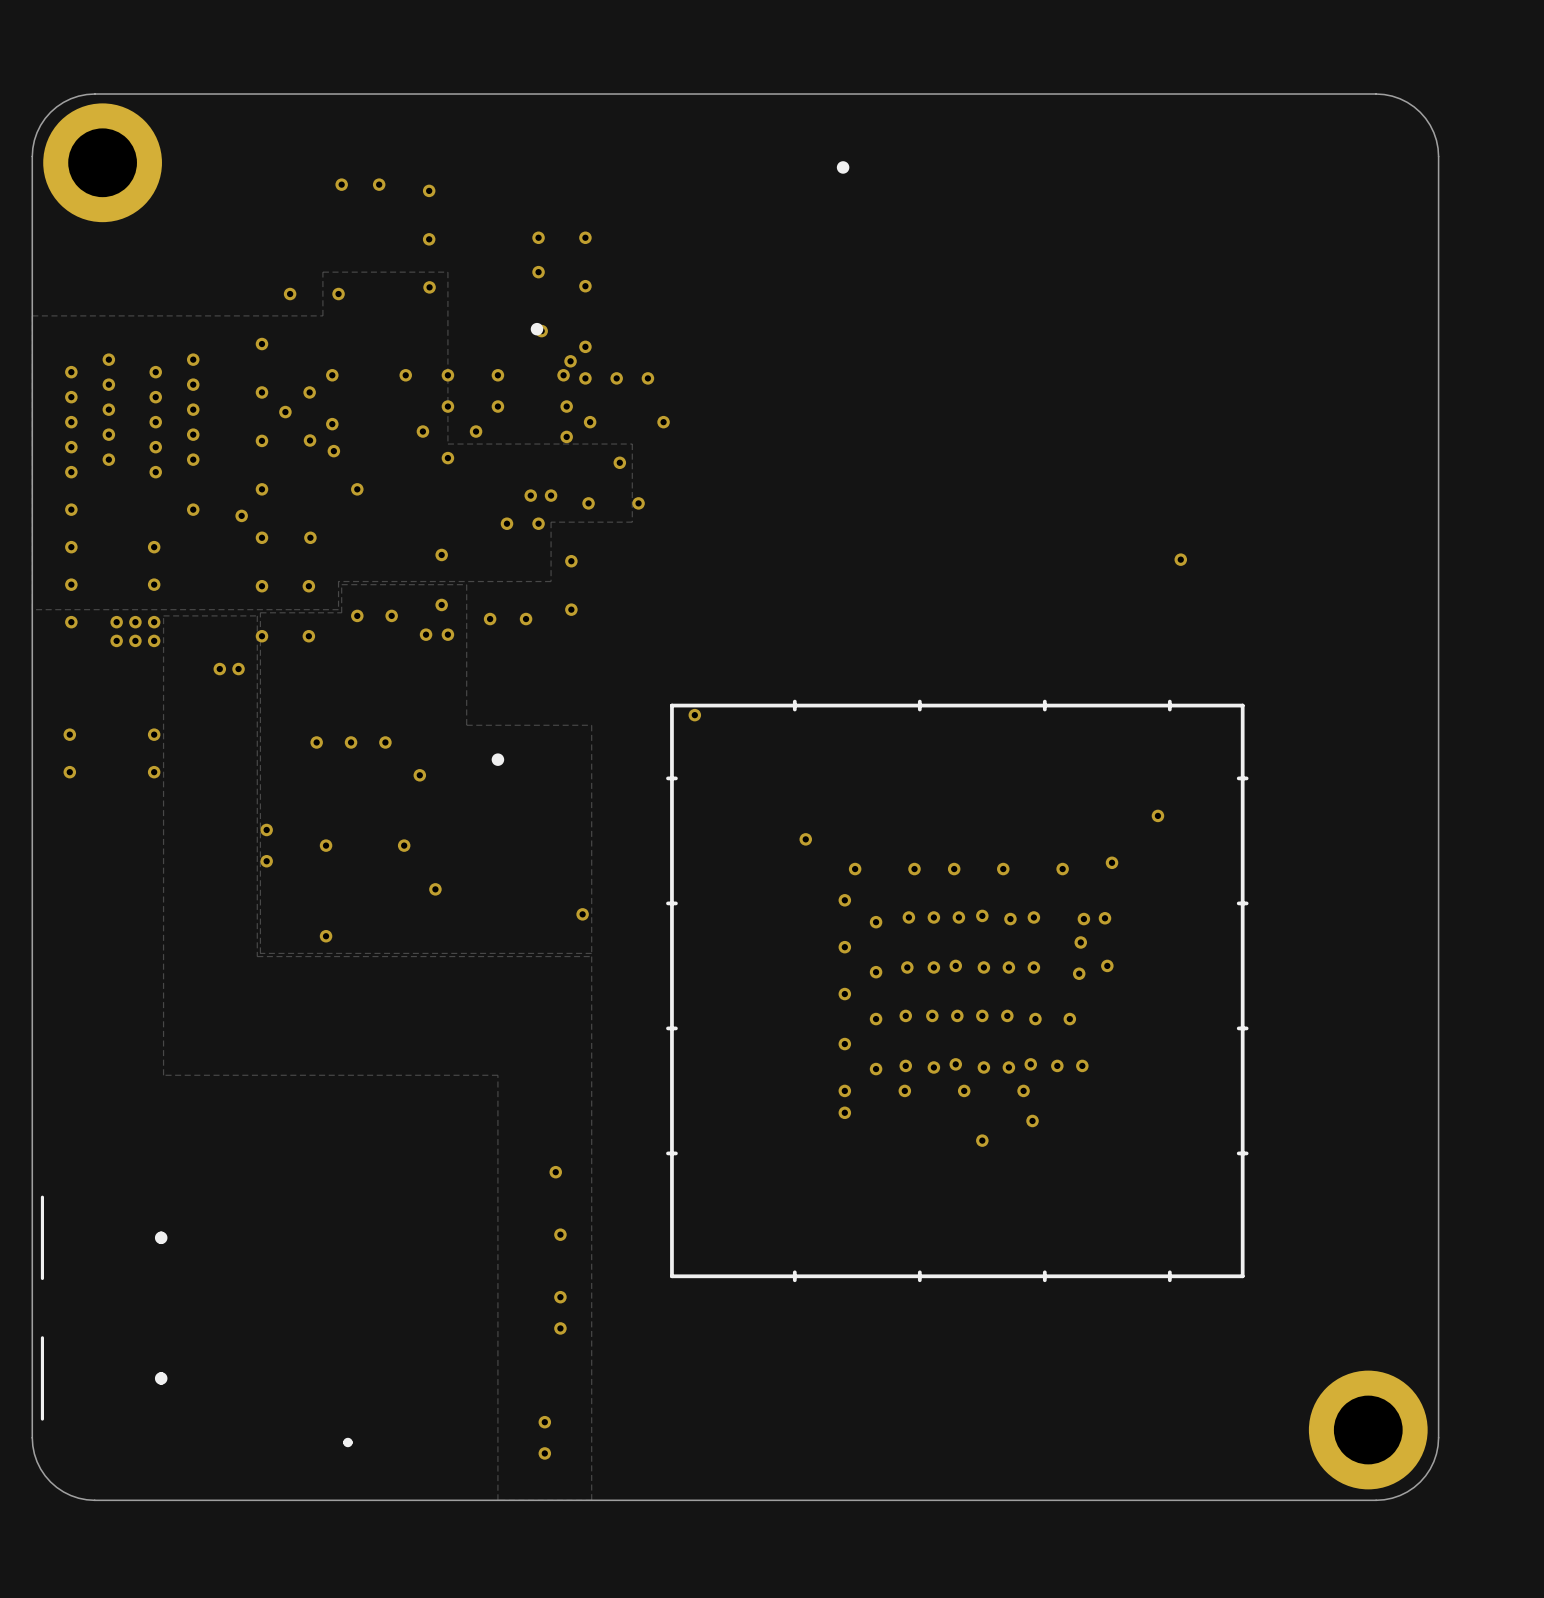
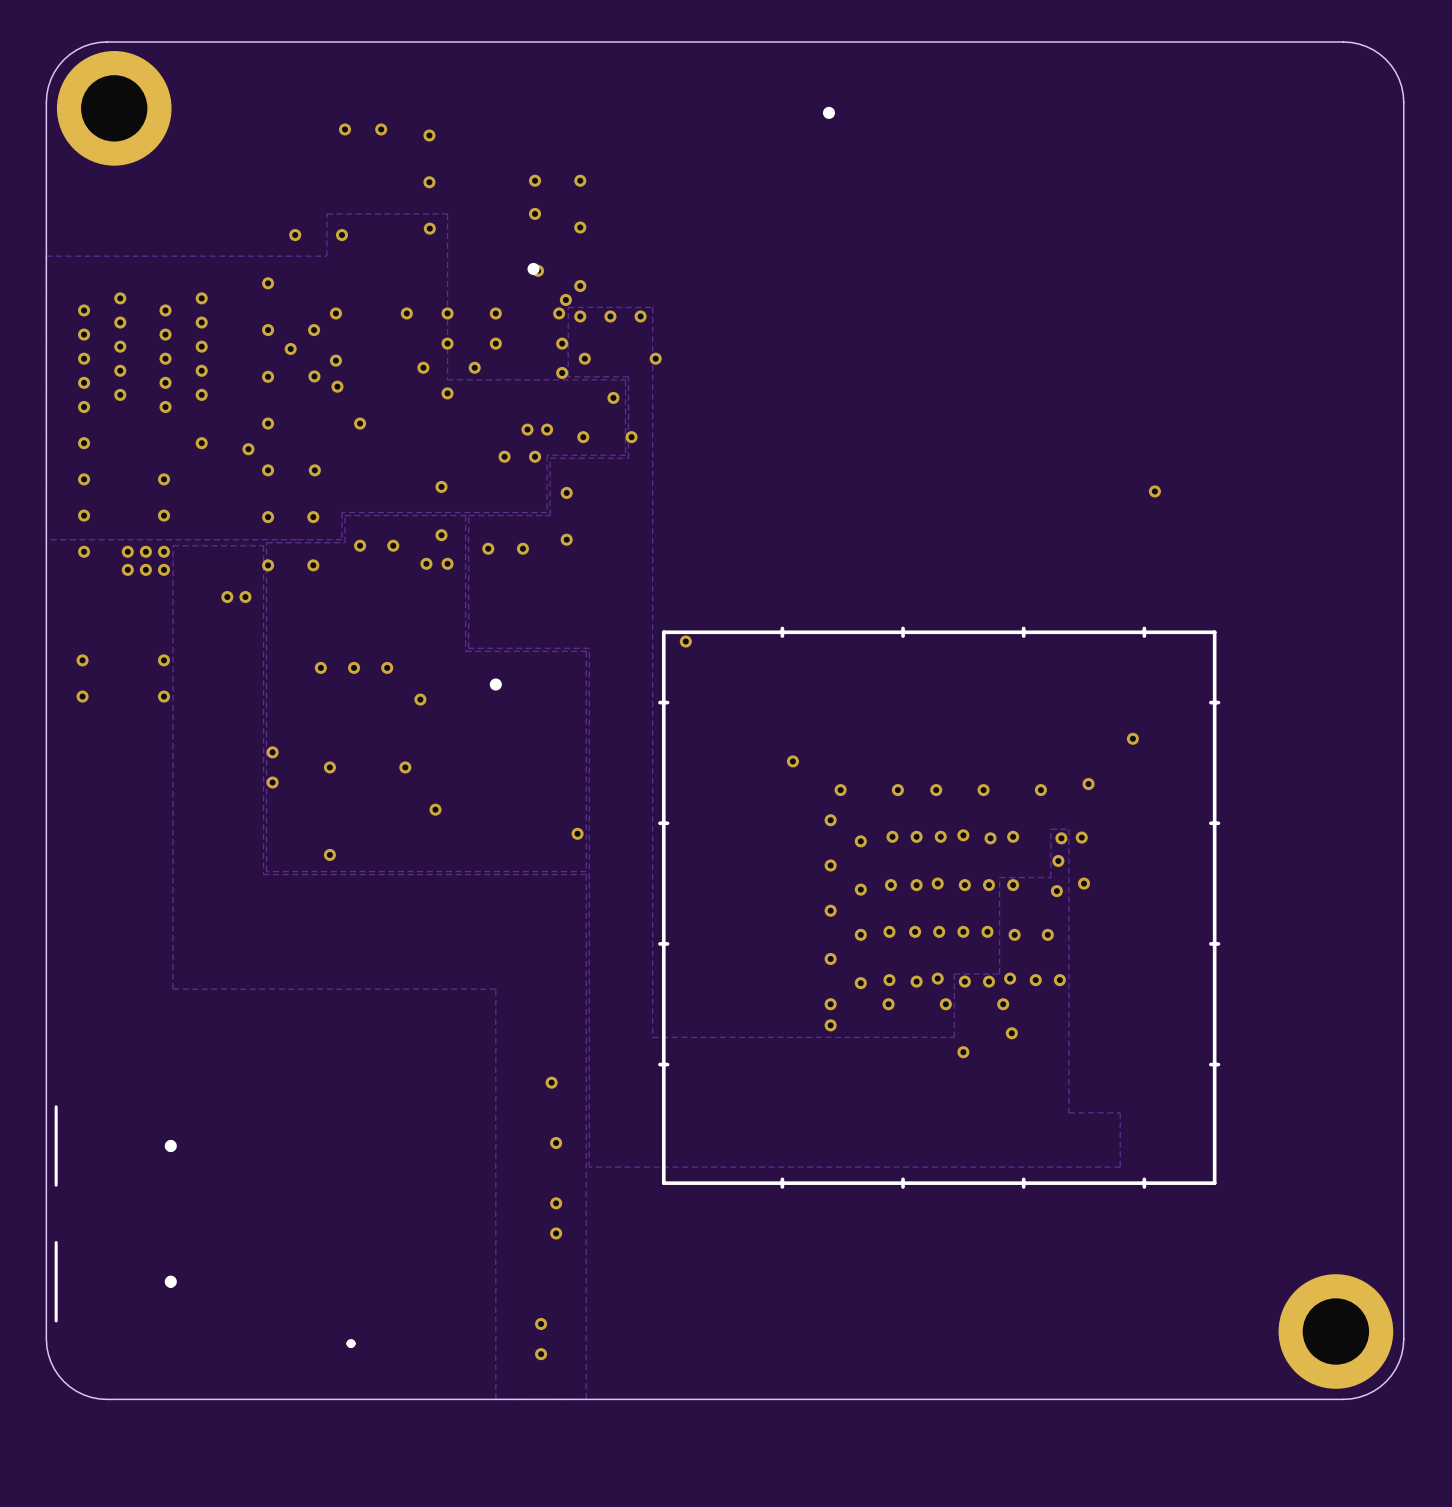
zone outline: none -> (568, 307) (568, 376) (628, 376) (628, 458) (550, 458) (550, 515) (468, 515) (468, 648) (589, 648) (589, 1167) (1120, 1167) (1120, 1112) (1068, 1112) (1068, 829) (1050, 829) (1050, 877) (999, 877) (999, 974) (954, 974) (954, 1037) (652, 1037) (652, 307) (568, 307)

